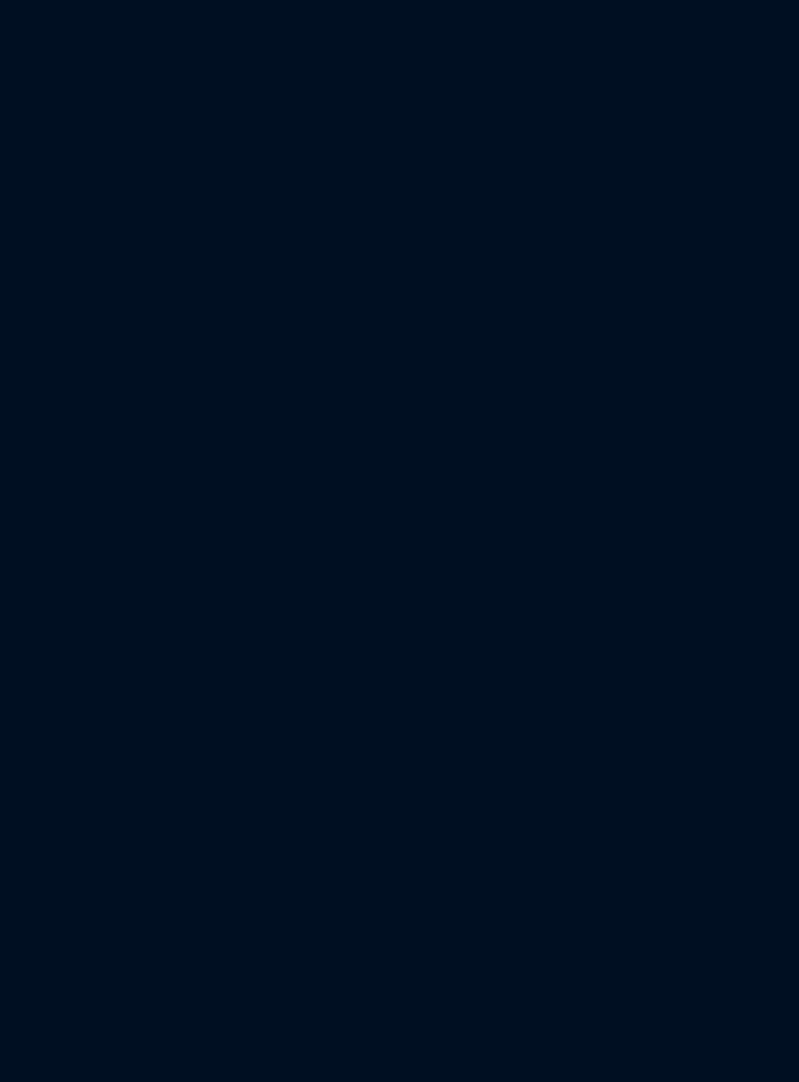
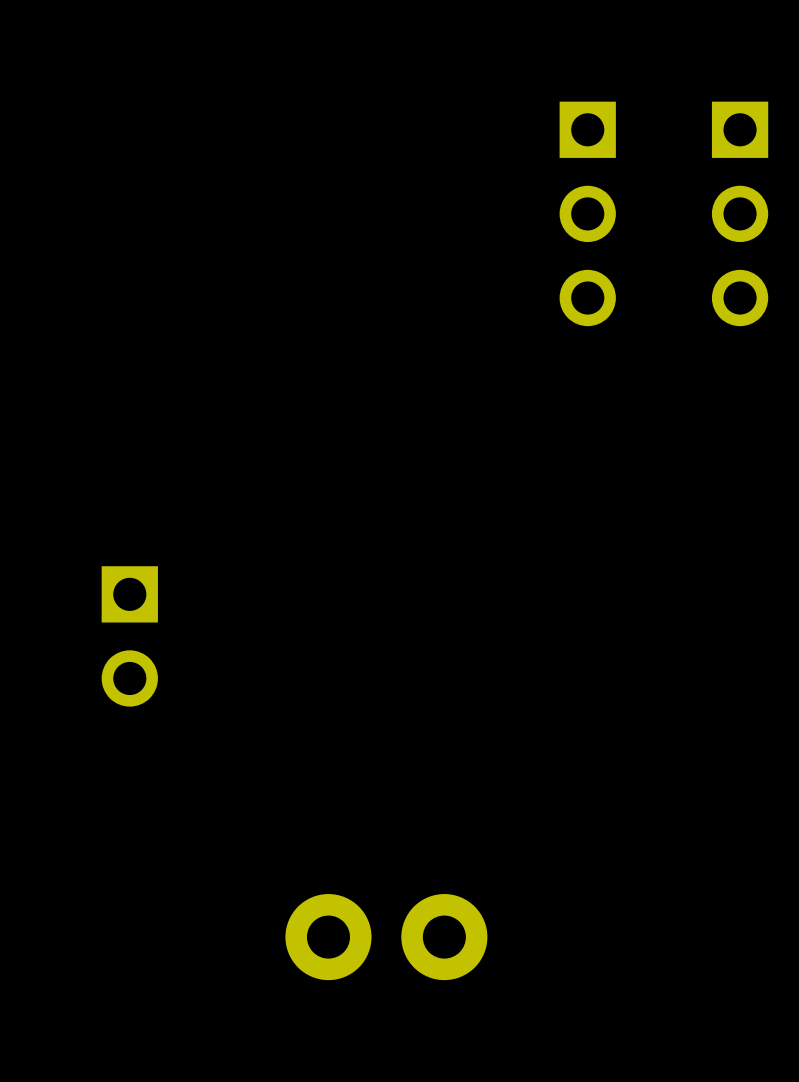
part: none -> (587, 213)
part: none -> (740, 213)
part: none -> (129, 636)
part: none -> (386, 937)

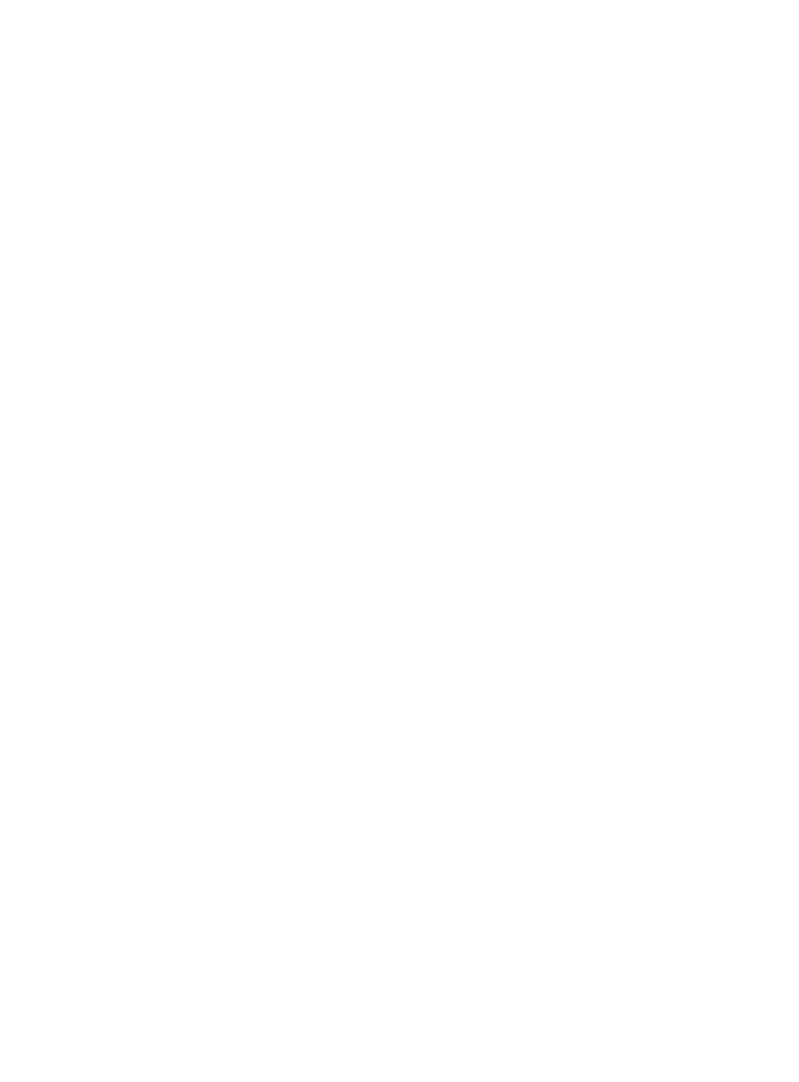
part: (587, 213) -> none
part: (740, 213) -> none
part: (129, 636) -> none
part: (386, 937) -> none

